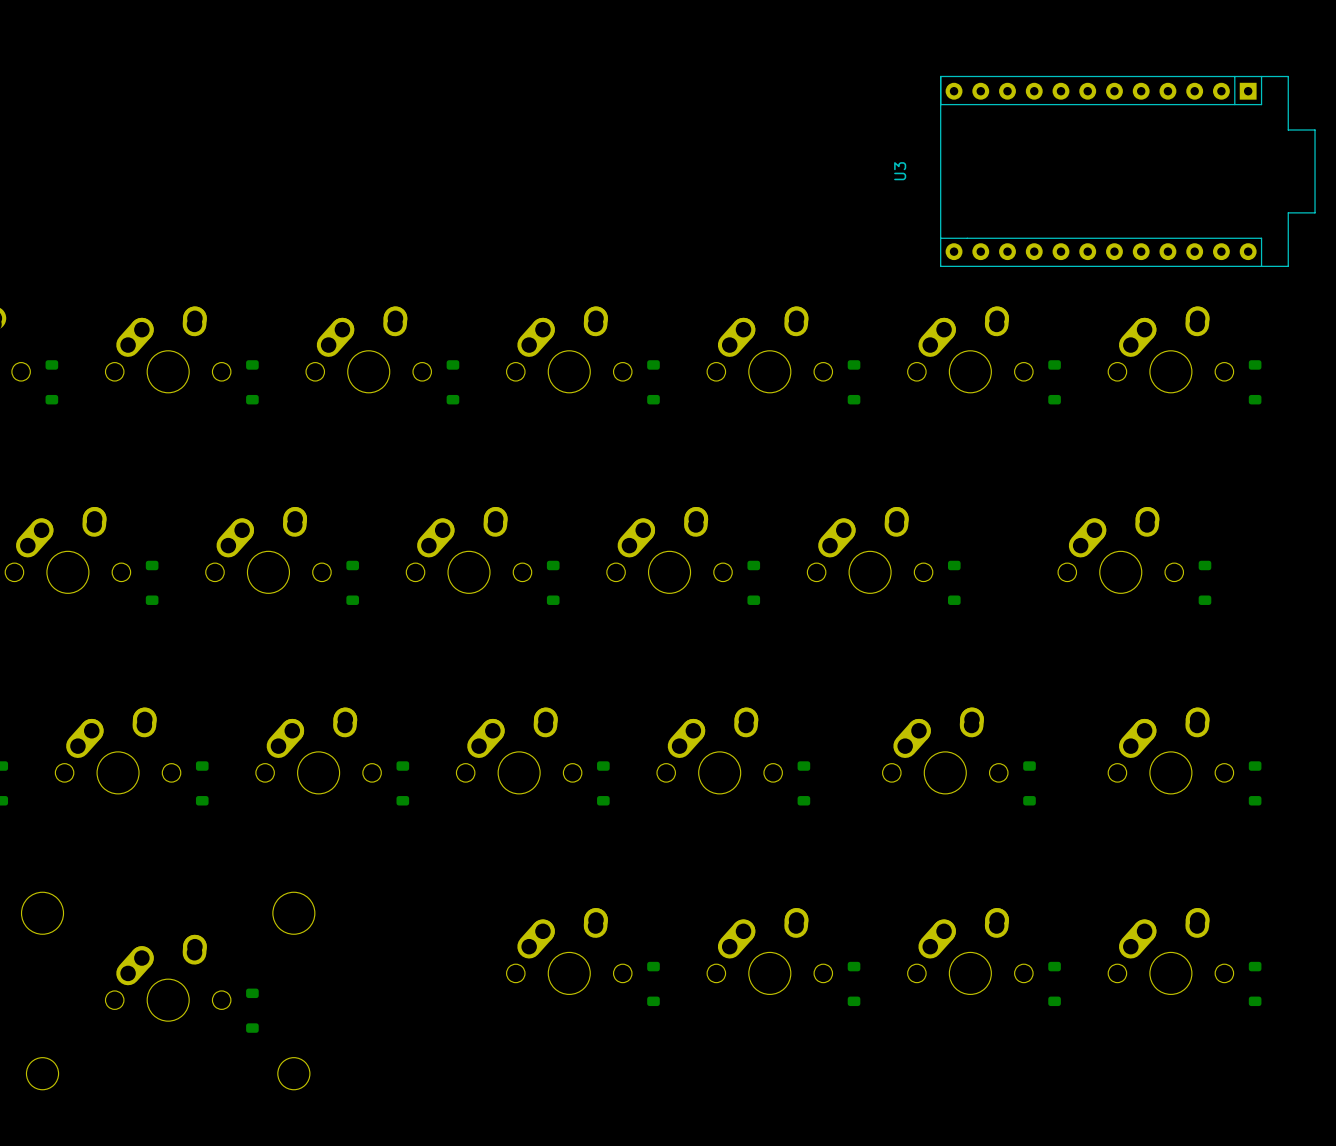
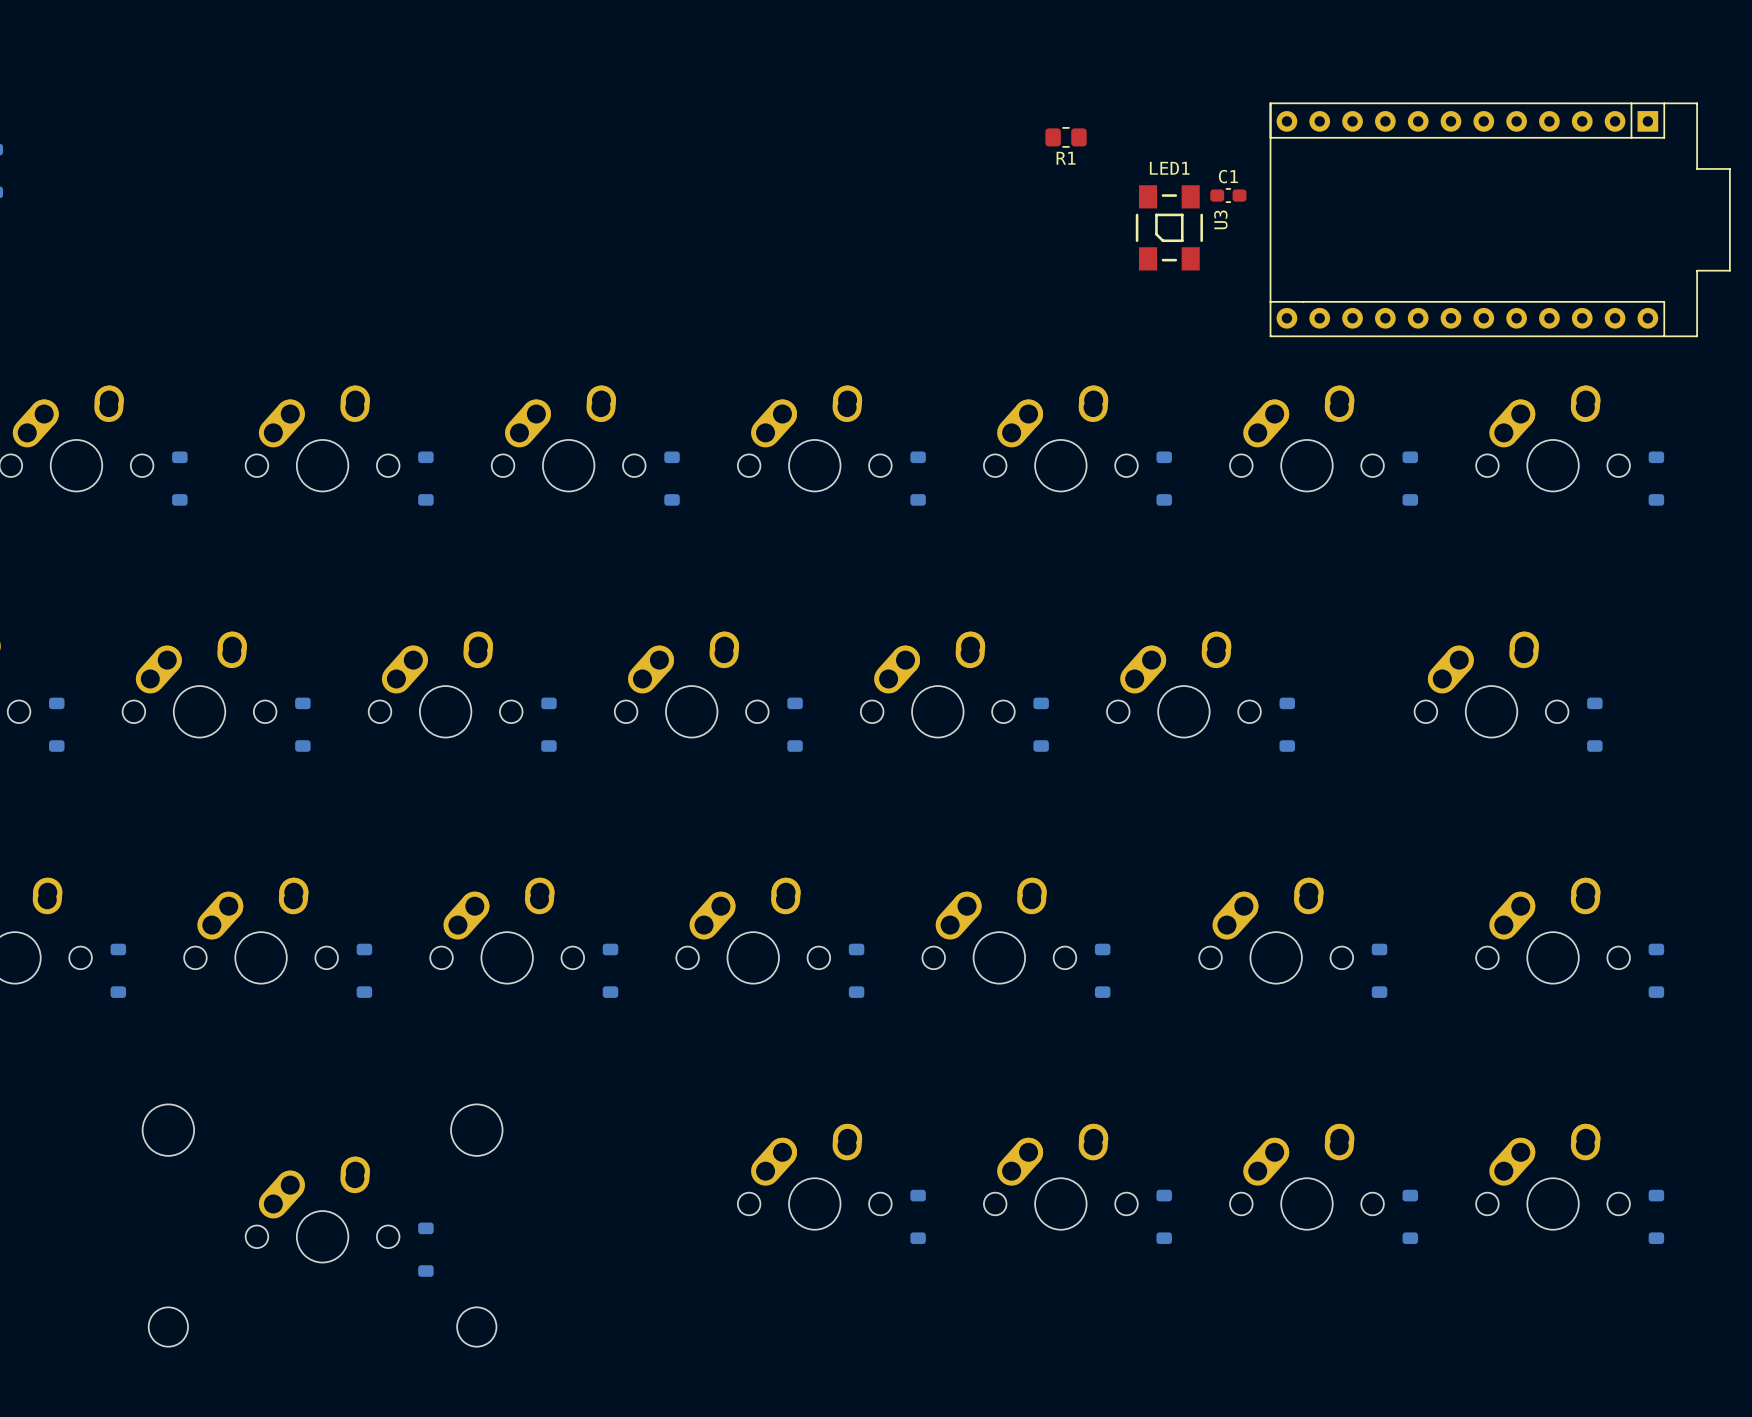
R1: none -> (1066, 137)
C1: none -> (1228, 195)
LED1: none -> (1169, 227)

